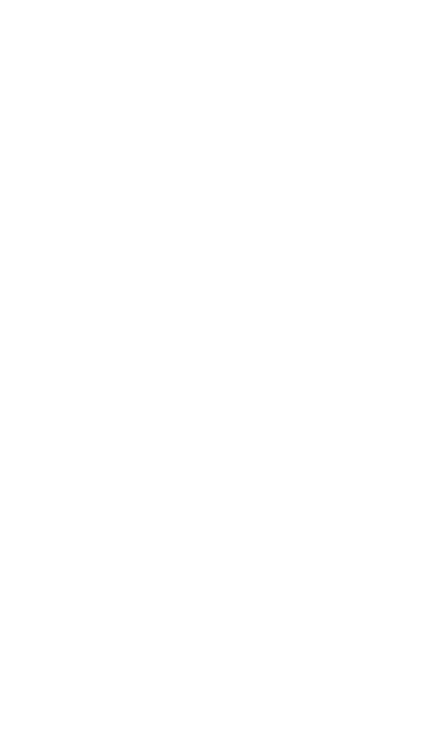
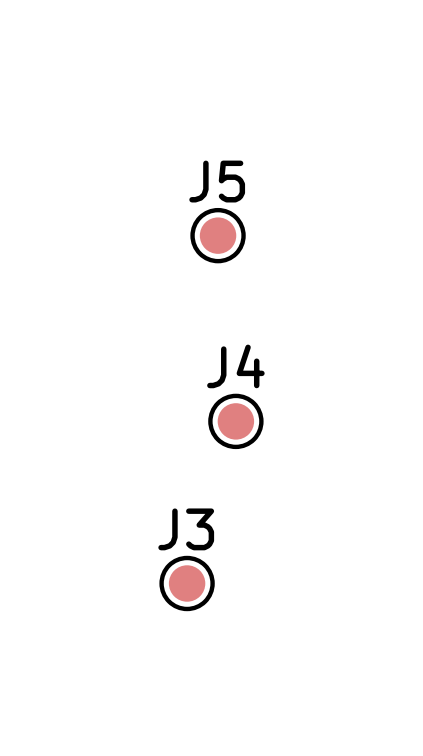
J5: none -> (218, 235)
J4: none -> (235, 421)
J3: none -> (187, 583)

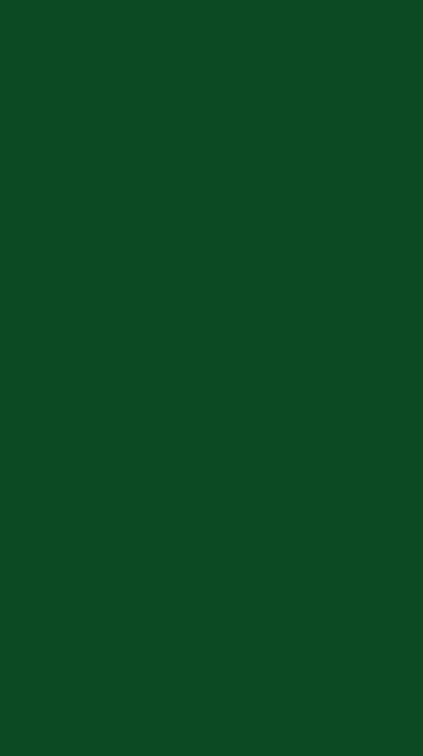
J5: (218, 235) -> none
J4: (235, 421) -> none
J3: (187, 583) -> none

